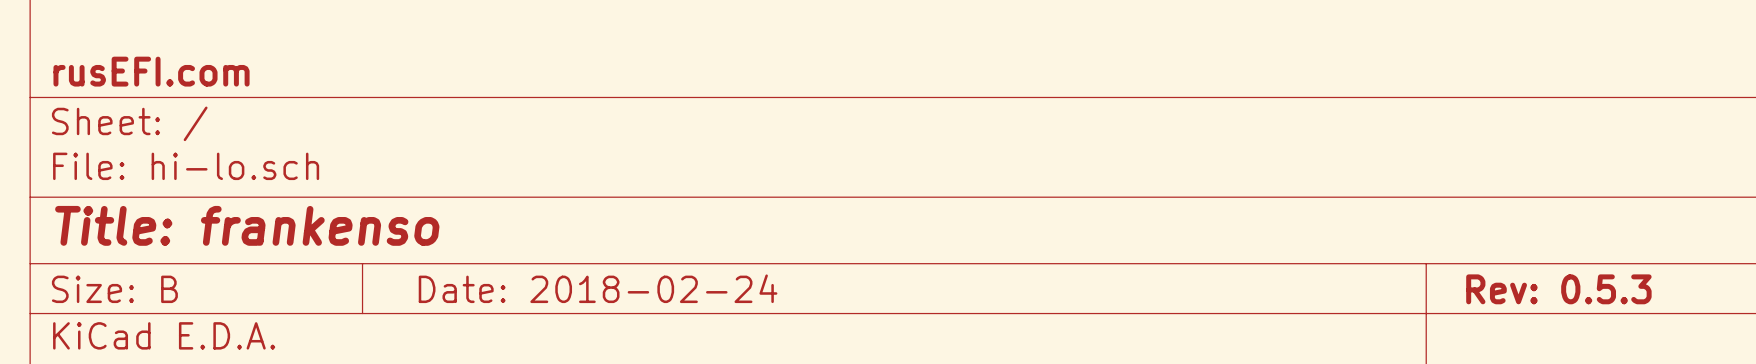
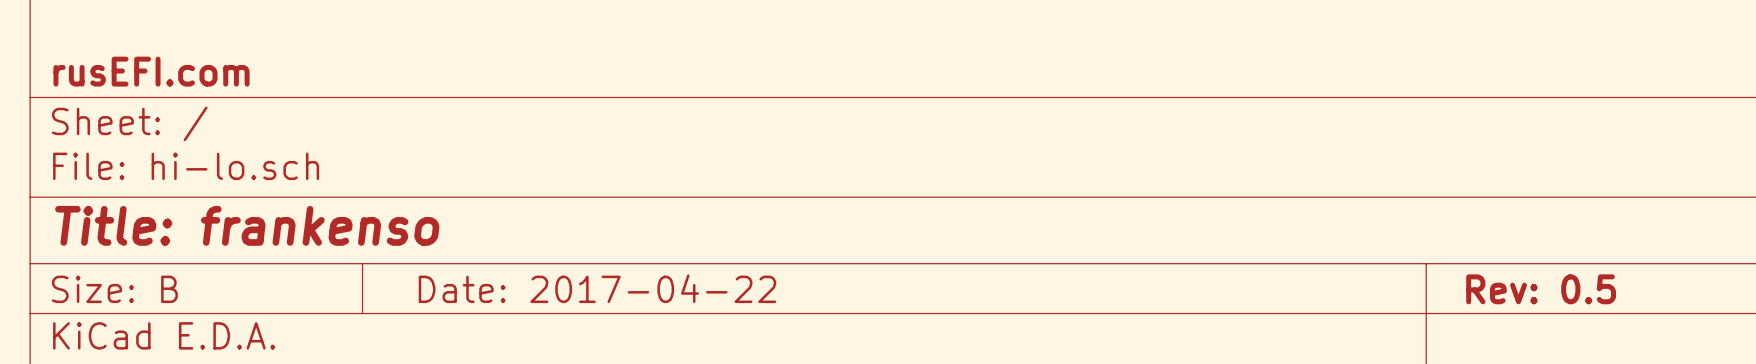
title block: Date: 2018-02-24 (598, 288) -> Date: 2017-04-22 (597, 288)
title block: Rev: 0.5.3 (1558, 289) -> Rev: 0.5 (1541, 289)

